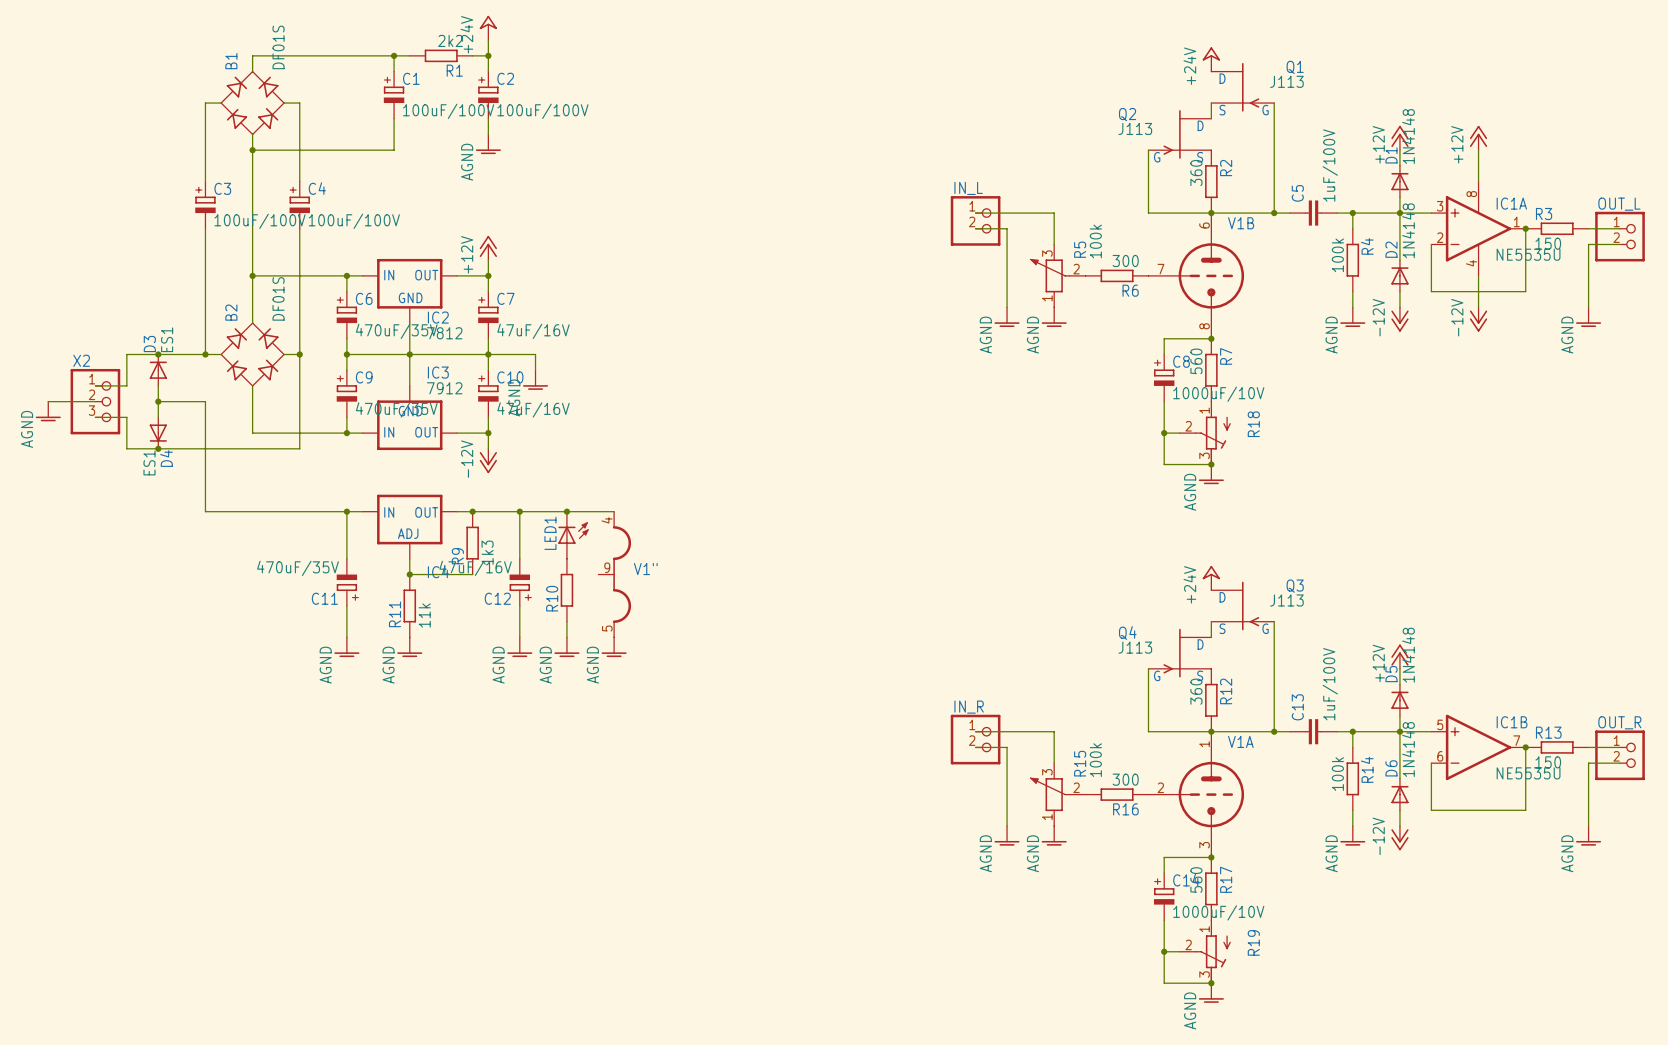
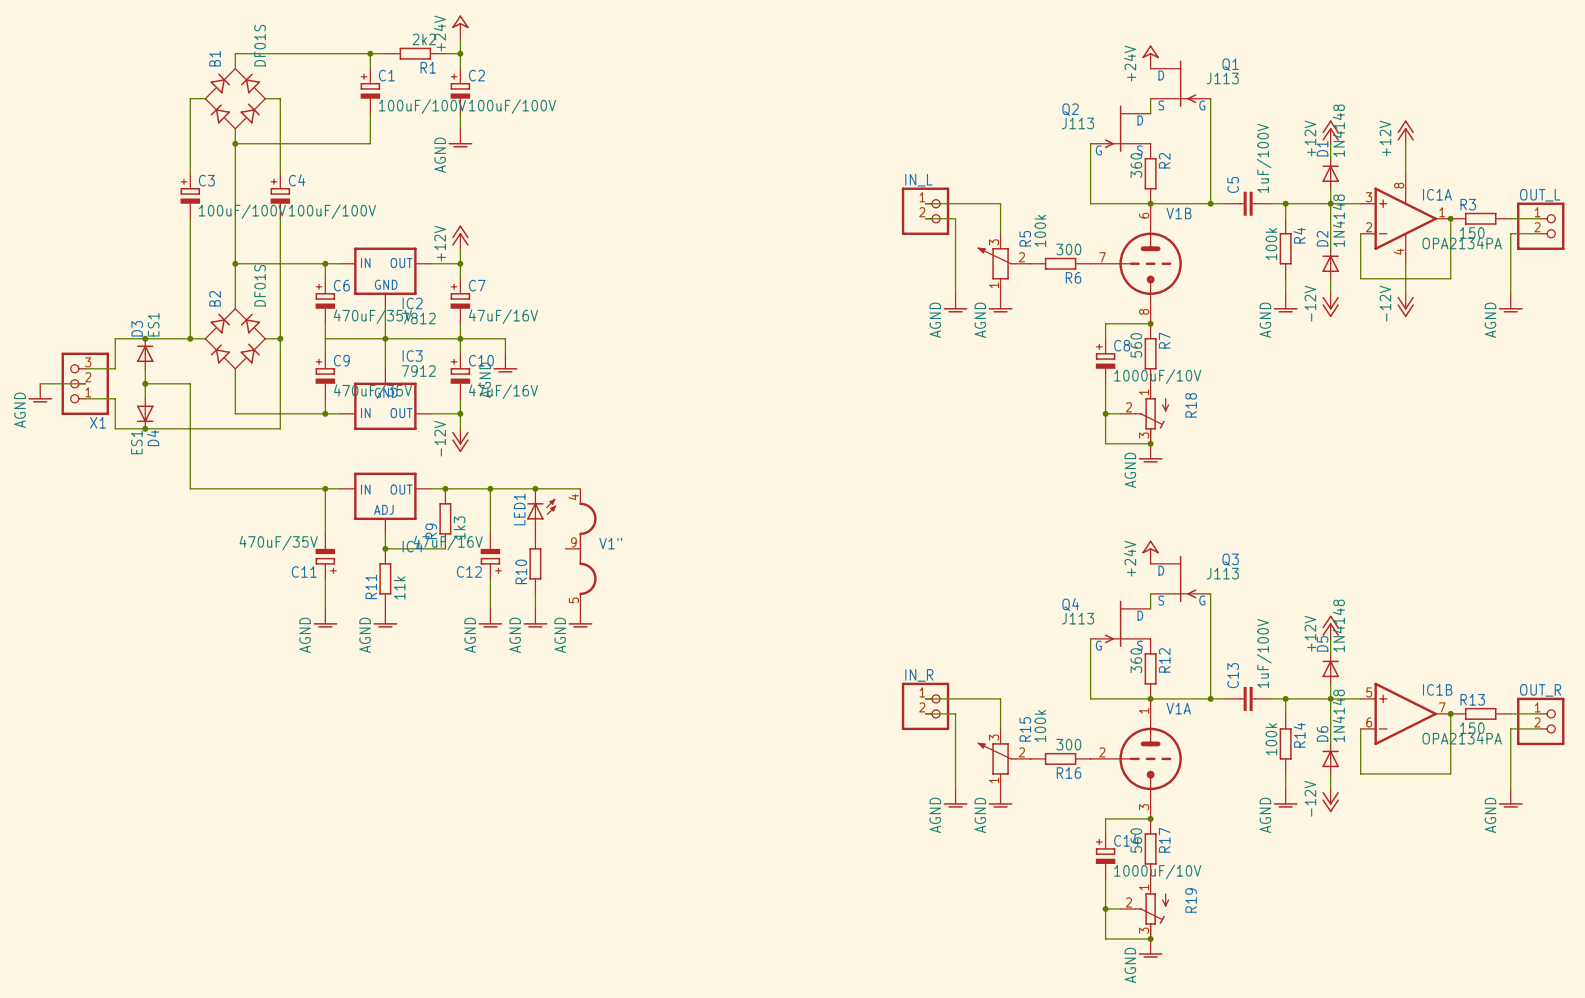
IC1A value: NE5535U (1528, 254) -> OPA2134PA (1462, 243)
junction: (346, 354) -> none
X2: (95, 401) -> none
X1: none -> (85, 383)
IC1B value: NE5535U (1528, 773) -> OPA2134PA (1462, 738)

